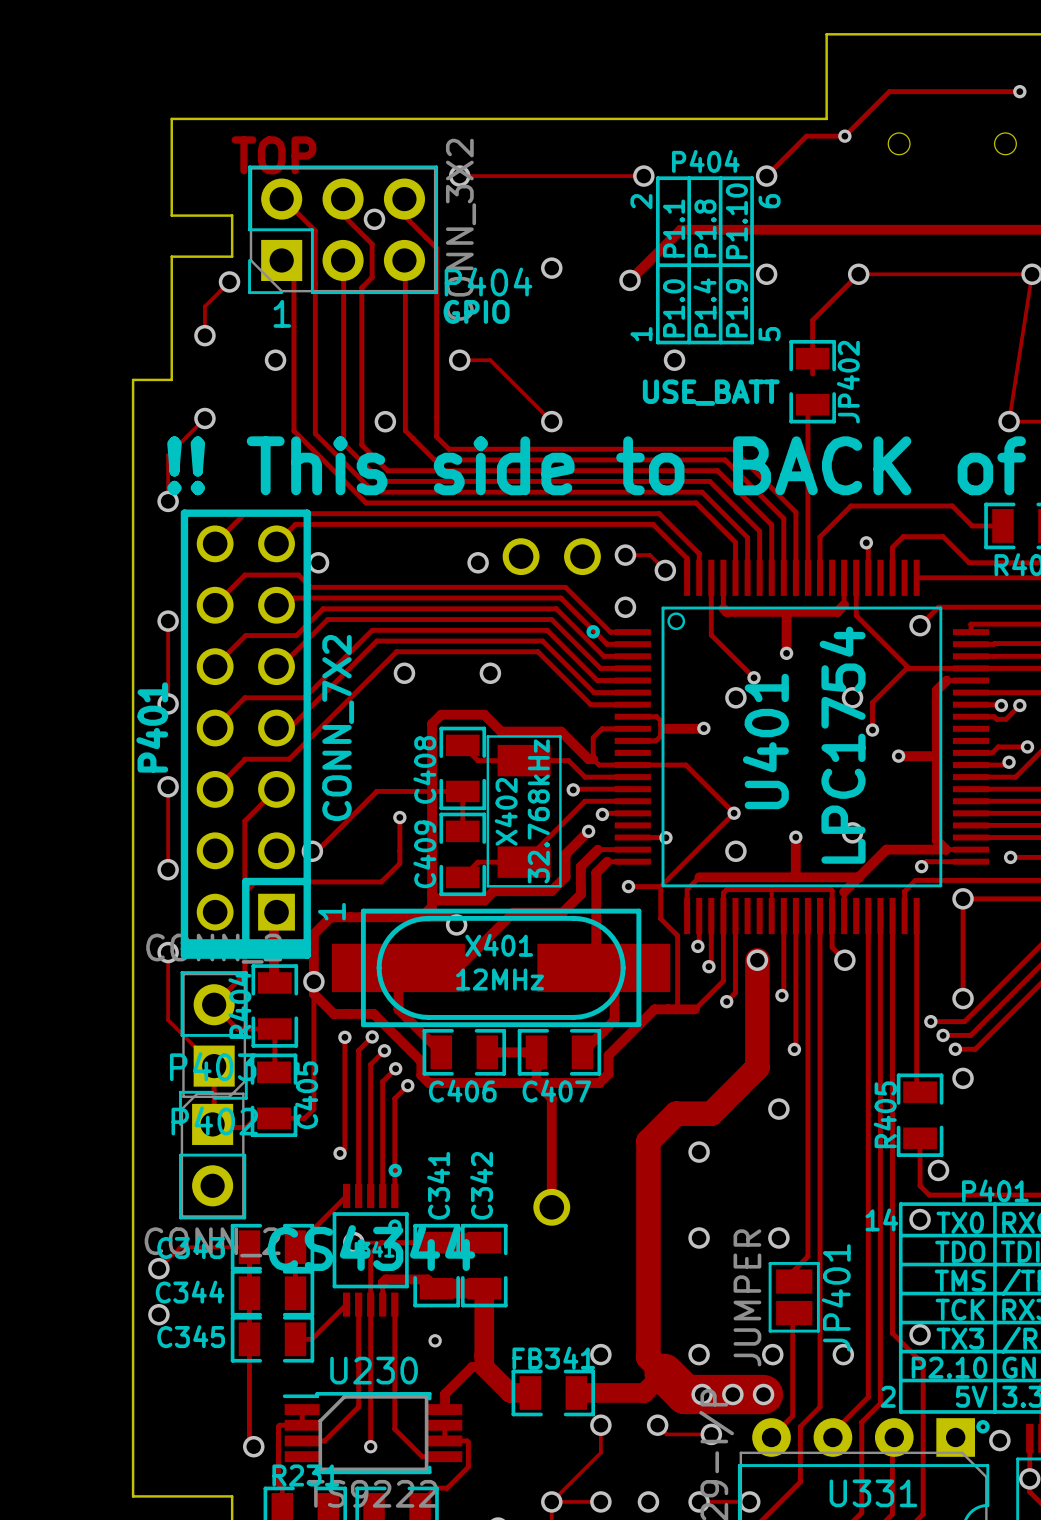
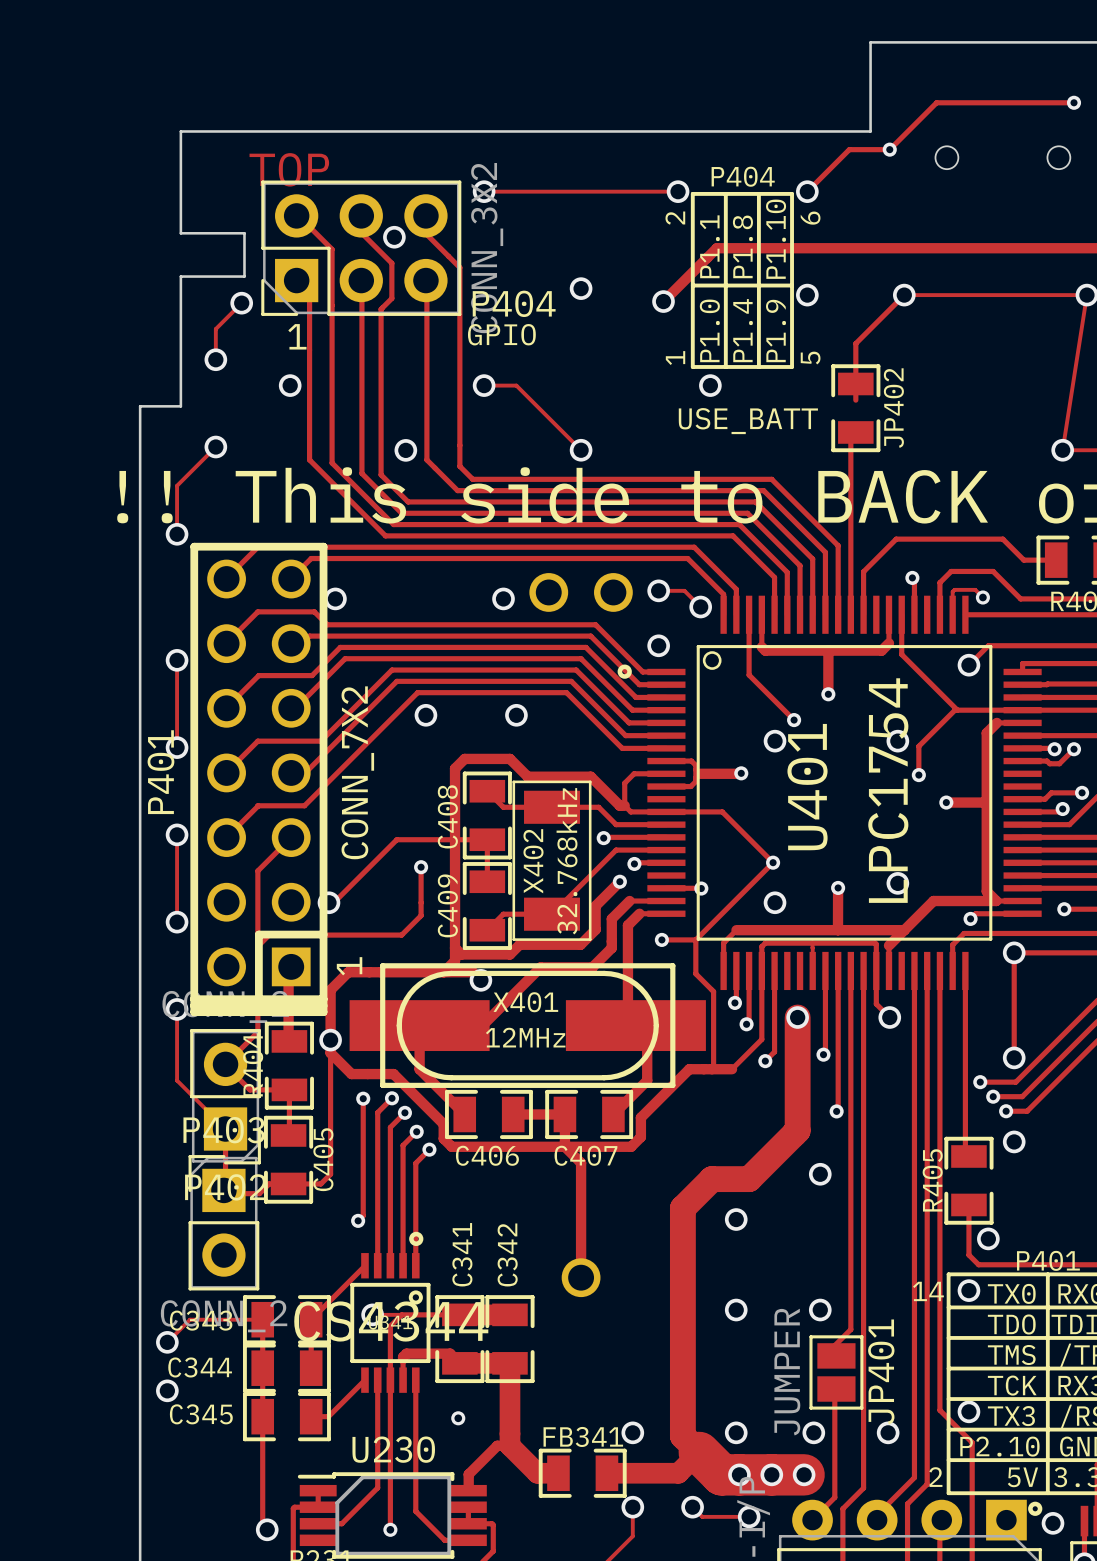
track: none -> (982, 597) (975, 589) (954, 589) (952, 591) (952, 614)
via: none -> (982, 597)

